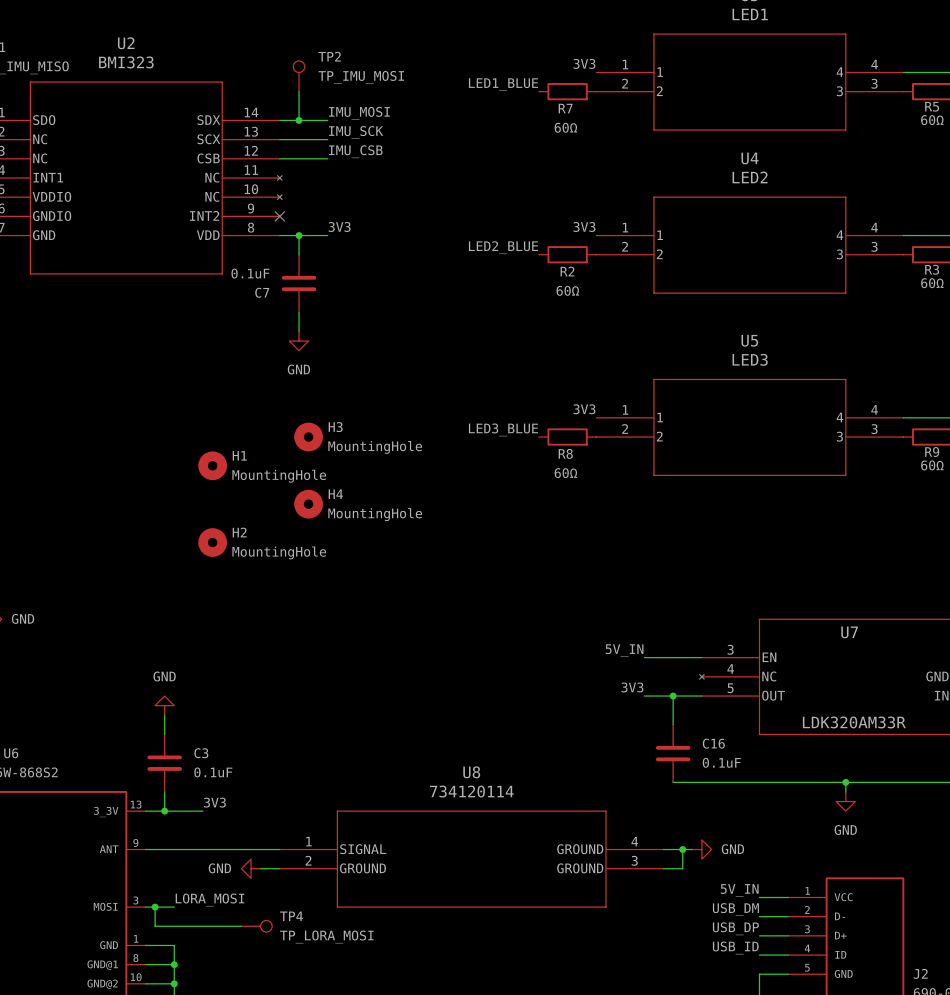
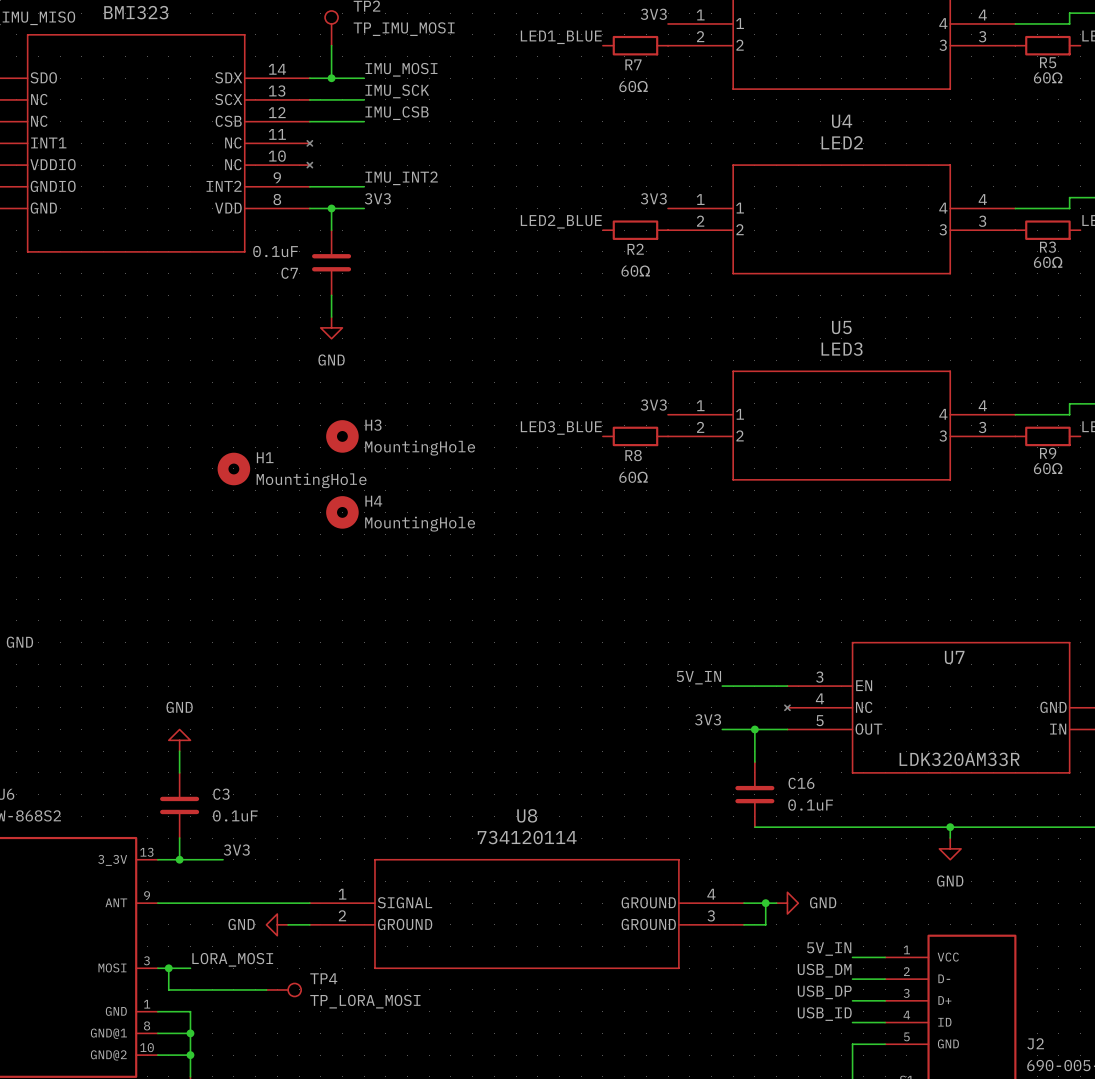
label: none -> IMU_INT2 (401, 178)
wire: none -> (309, 186) (364, 186)
no-connect mark: (279, 216) -> none
H2: MountingHole (212, 542) -> none

